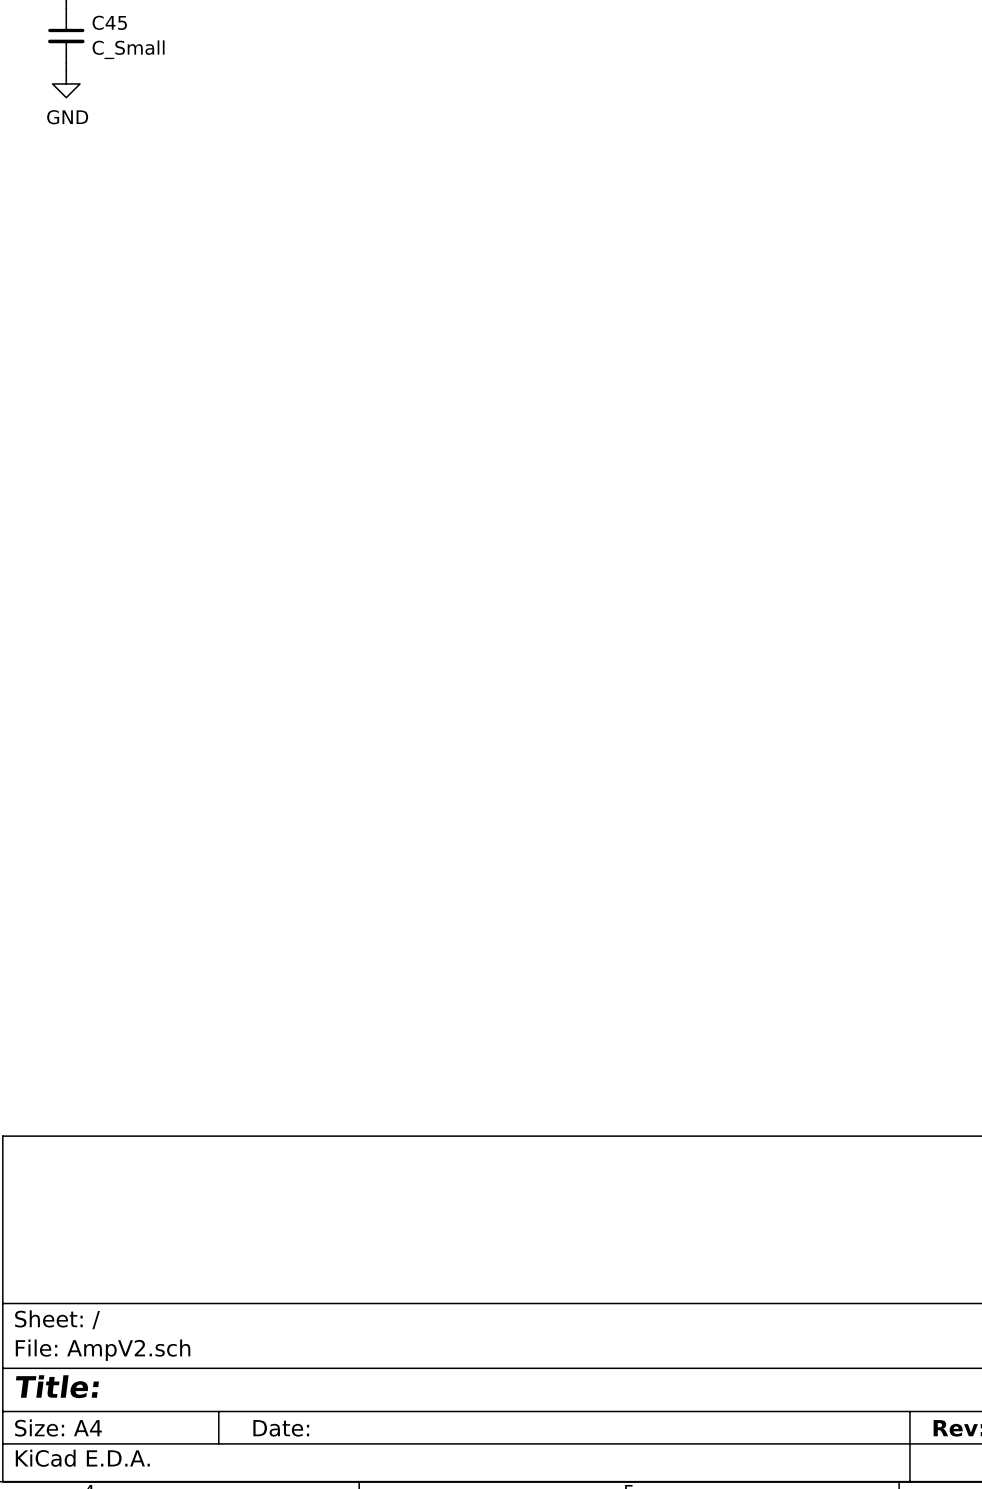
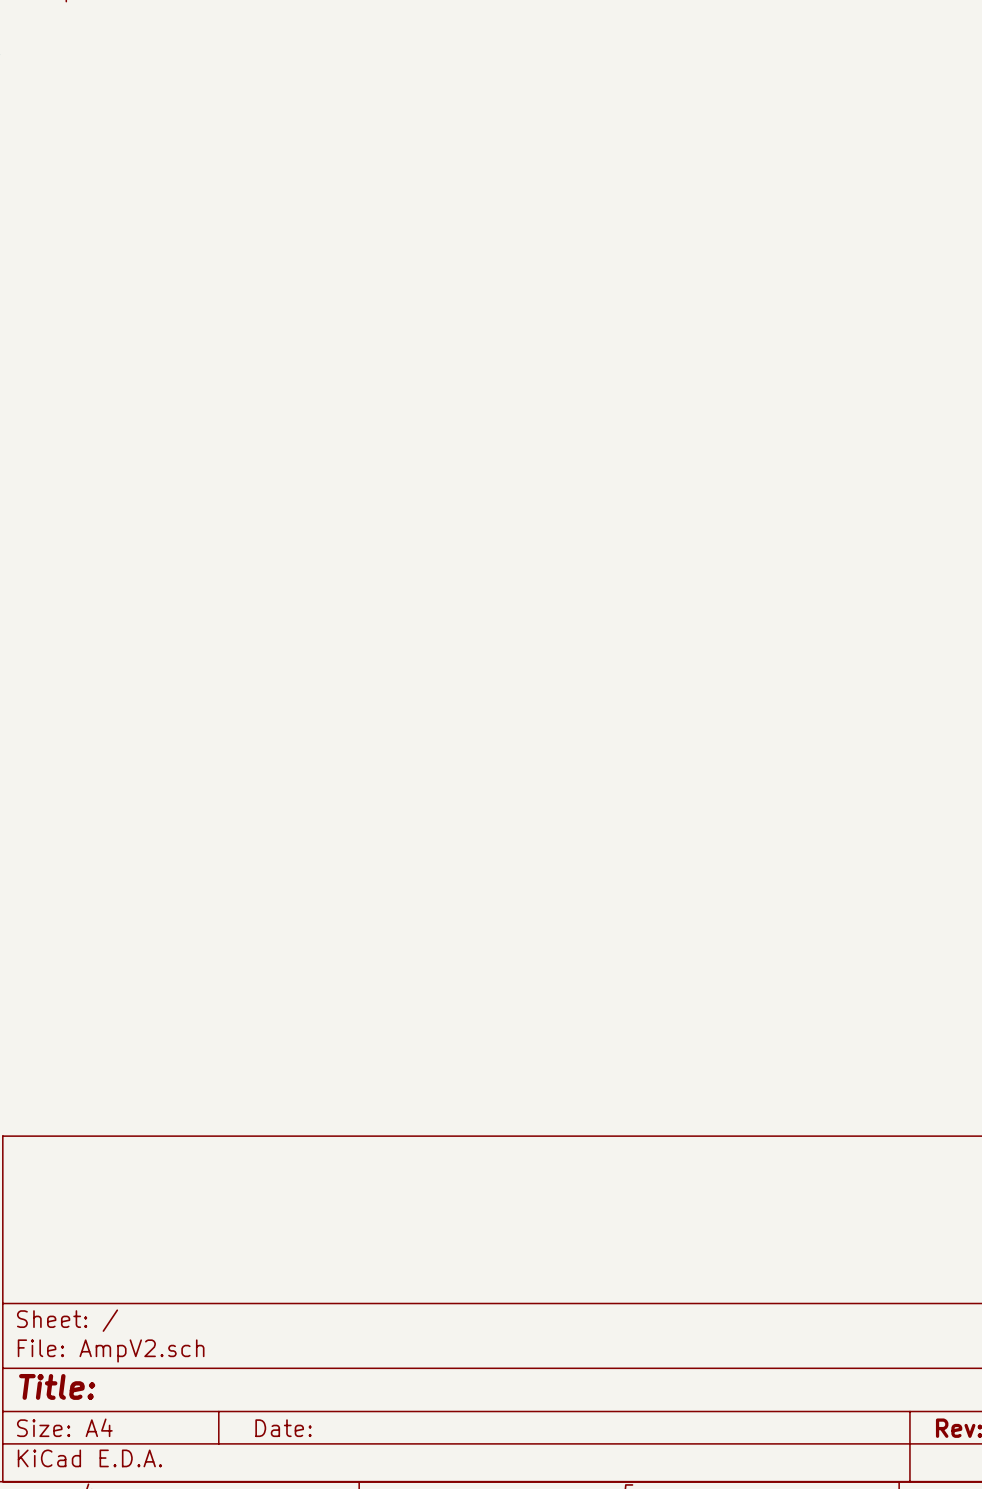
wire: (66, 1) (66, 8) -> none
C45: C_Small (66, 35) -> none
wire: (66, 63) (66, 70) -> none
power symbol: GND (66, 83) -> none

